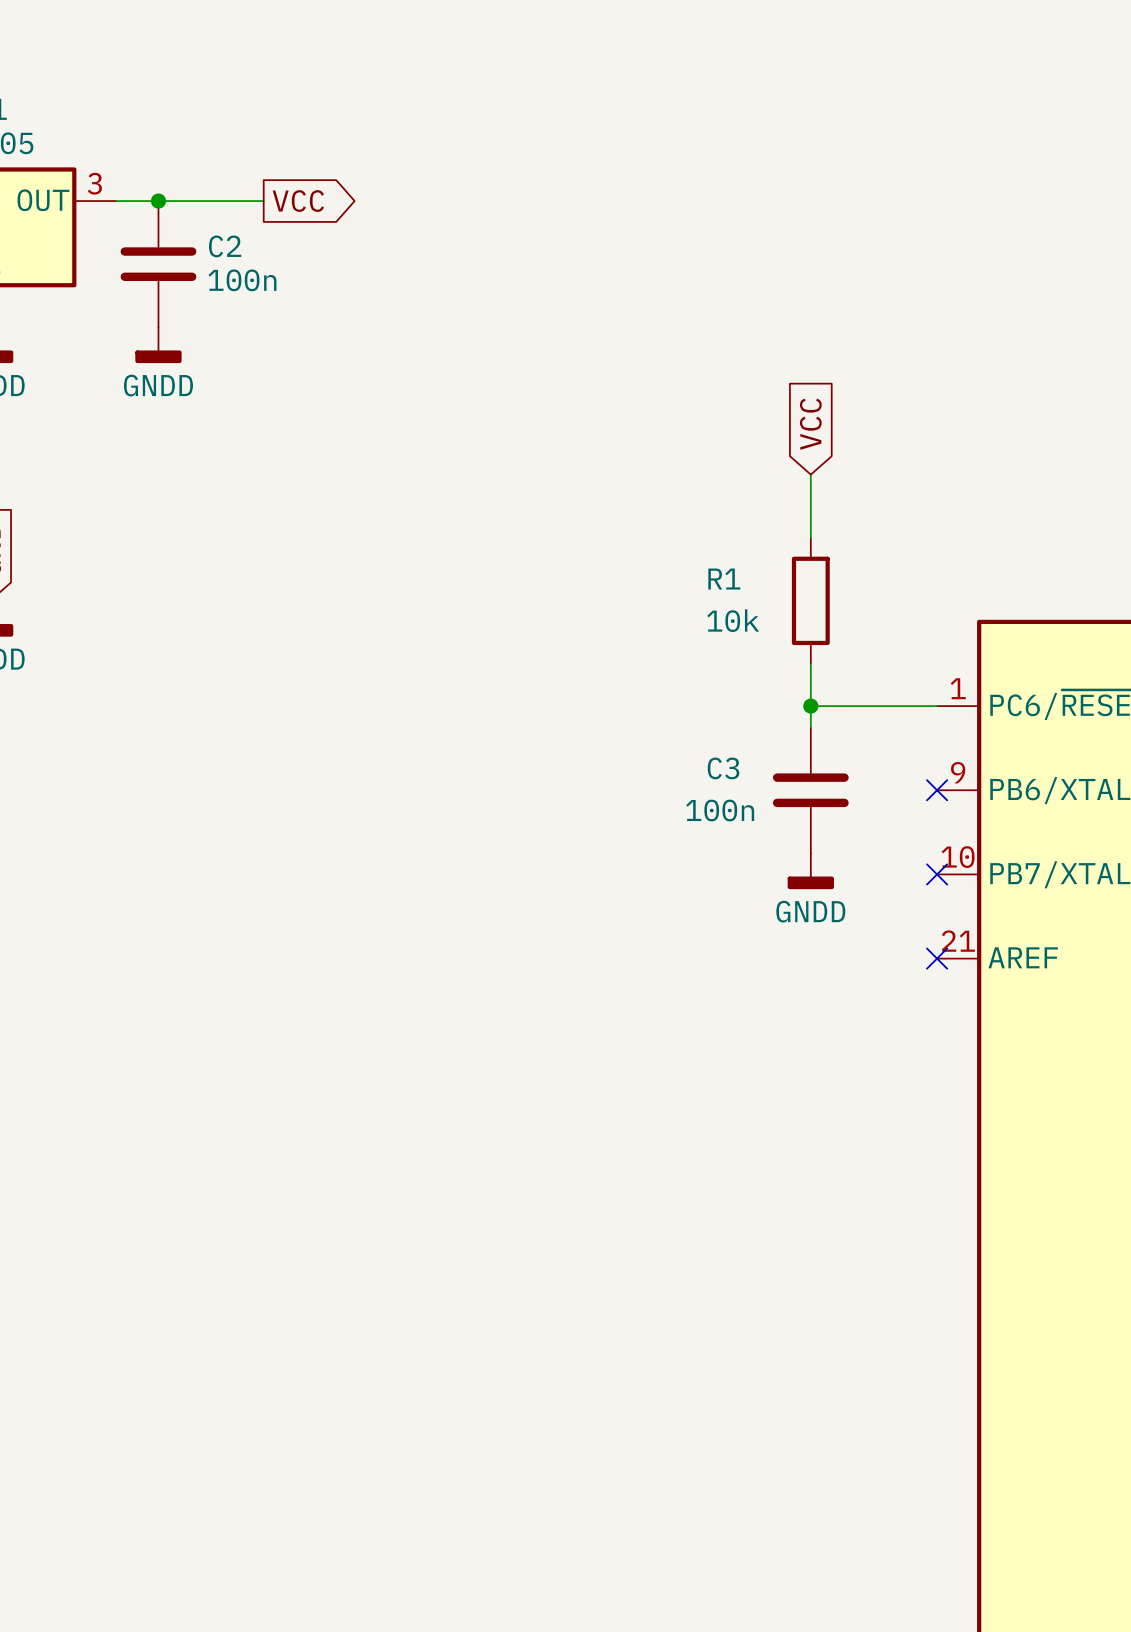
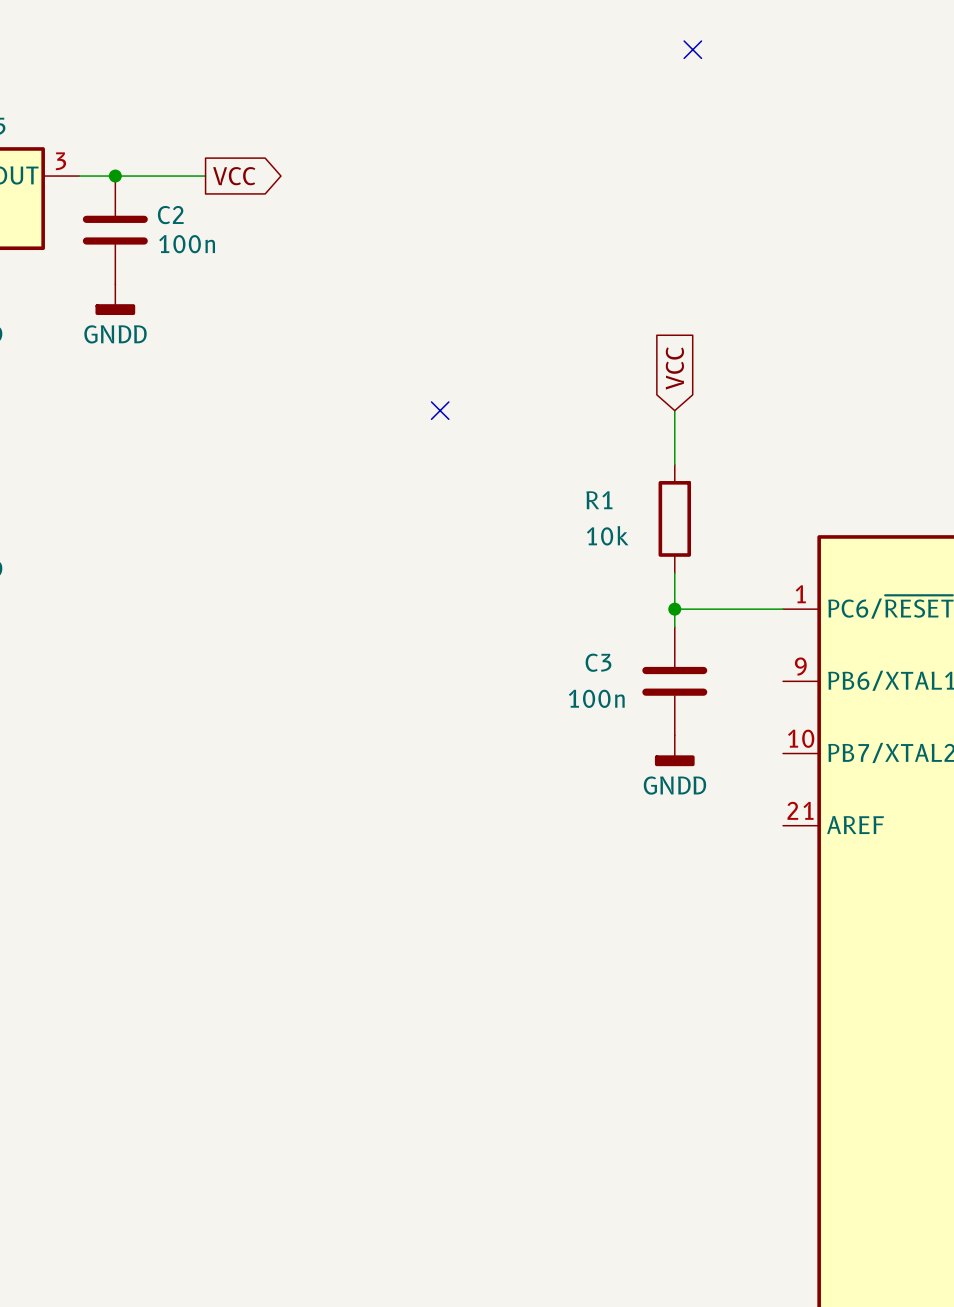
no-connect mark: none -> (692, 49)
no-connect mark: none -> (440, 410)
no-connect mark: (937, 790) -> none
no-connect mark: (937, 874) -> none
no-connect mark: (937, 958) -> none

